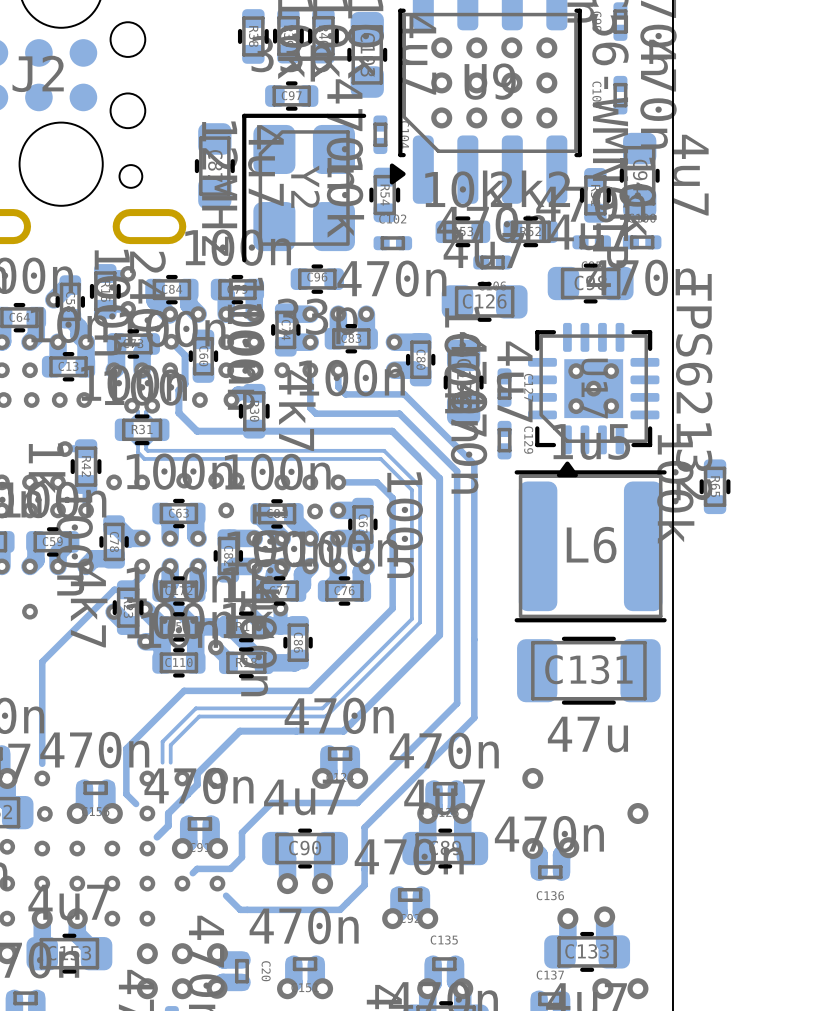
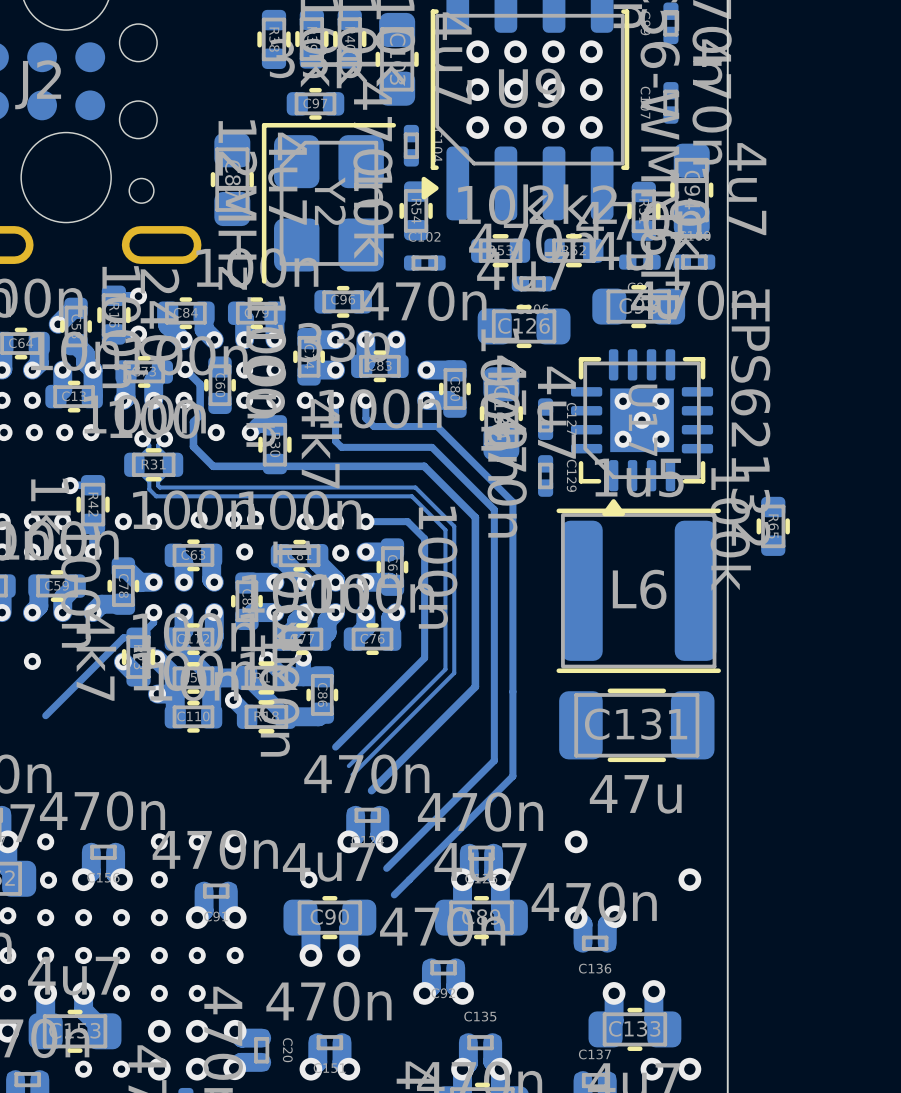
track: (42, 661) (42, 763) -> none
track: (310, 690) (184, 690) (126, 748) (126, 794) (136, 803) -> none
track: (322, 708) (195, 708) (162, 741) (162, 762) -> none
track: (325, 716) (199, 716) (170, 745) (170, 762) -> none
track: (343, 731) (239, 731) (197, 773) (197, 784) (168, 813) (168, 825) (157, 837) -> none
track: (357, 802) (271, 802) (241, 832) (241, 857) (230, 868) (197, 868) (192, 873) -> none
via: none -> (309, 879)
track: (364, 827) (364, 885) (340, 909) (240, 909) (226, 895) -> none
via: none -> (197, 993)
via: none -> (83, 1069)
via: none -> (121, 1069)

